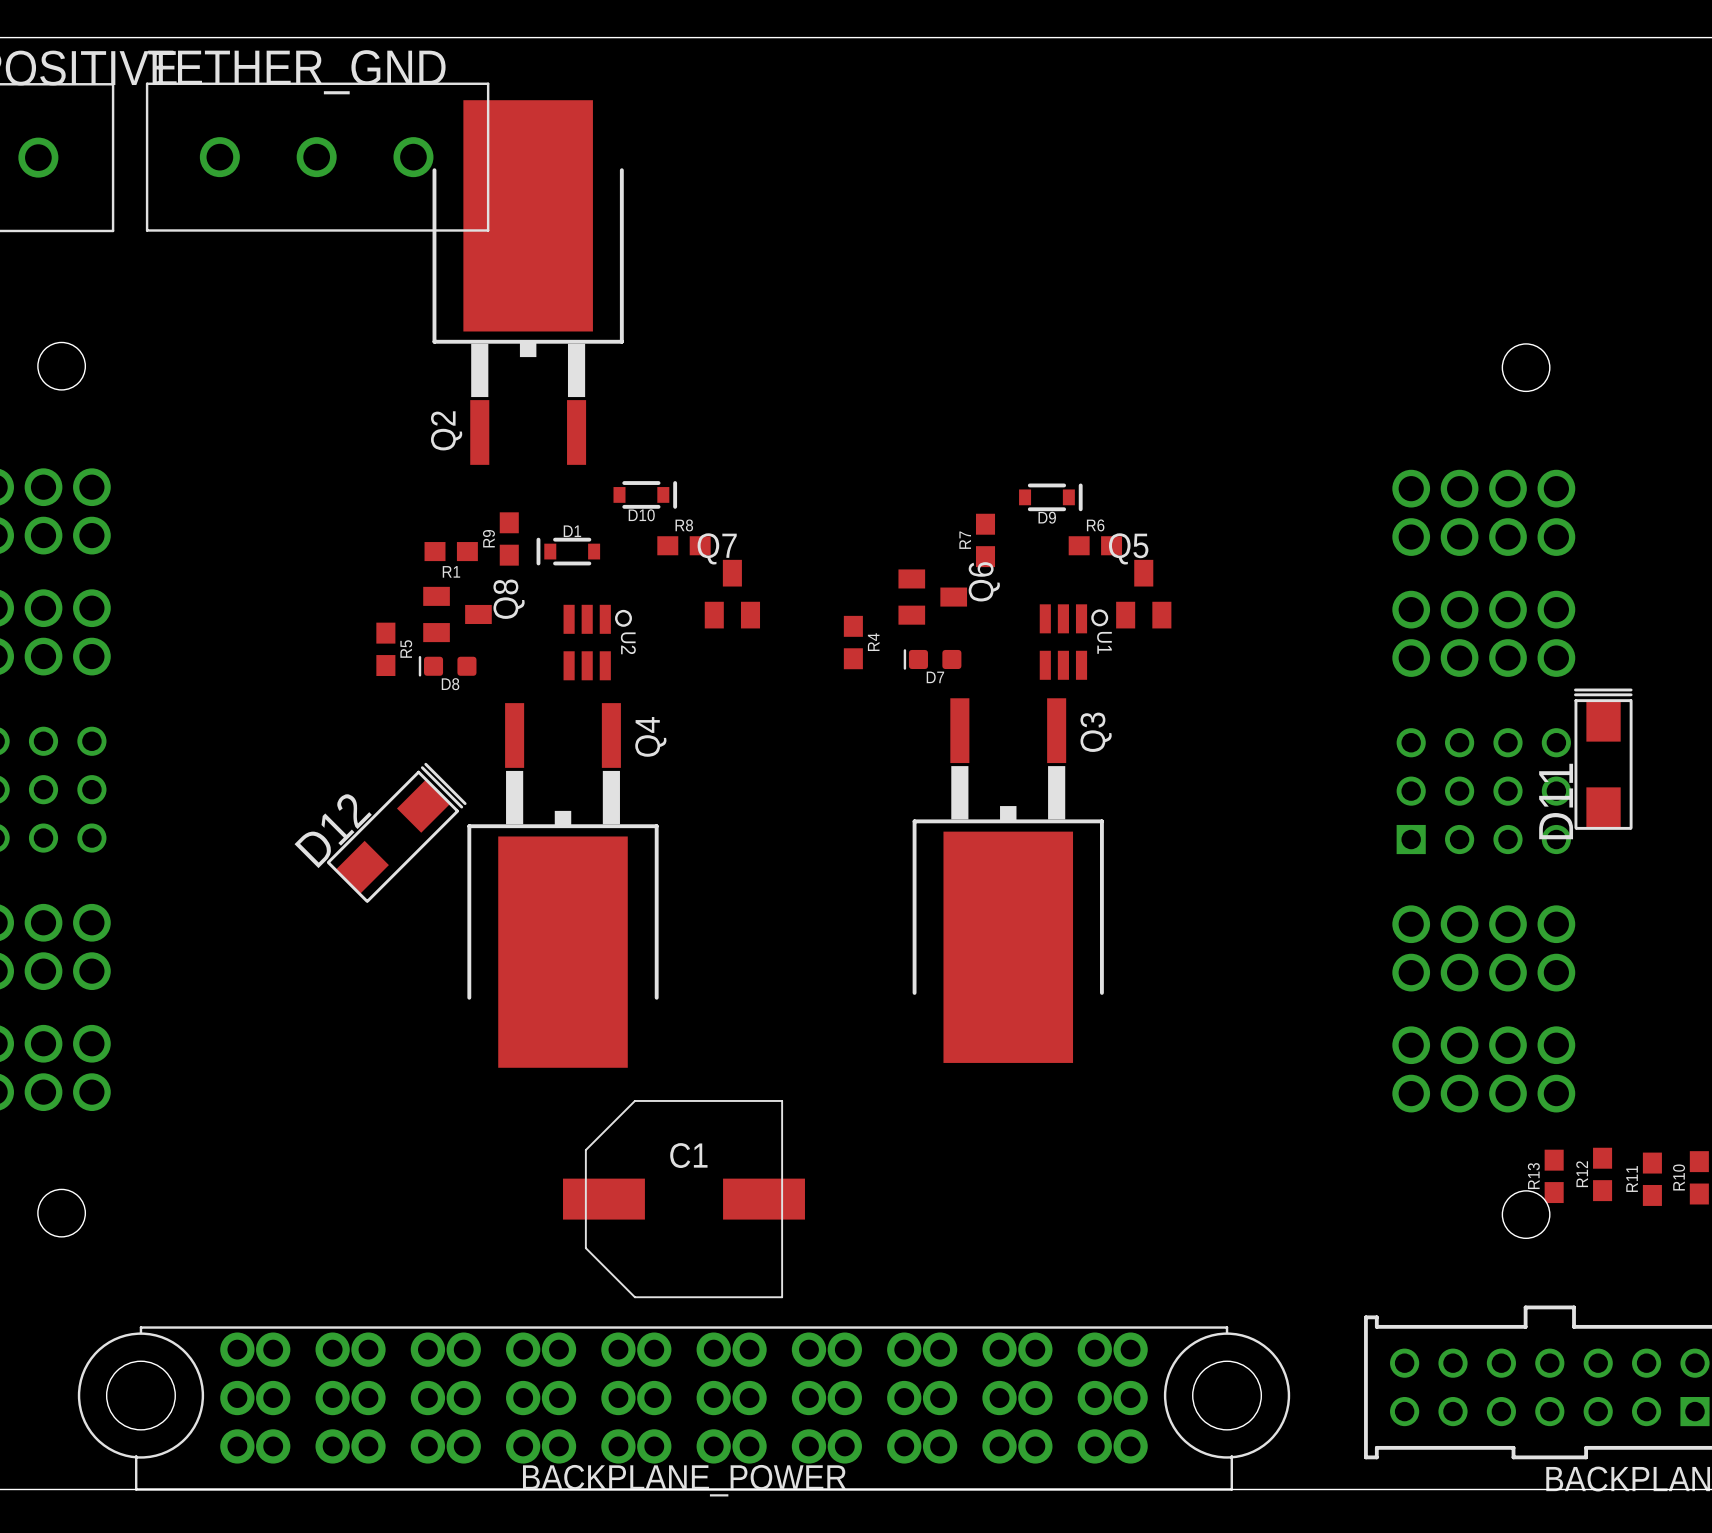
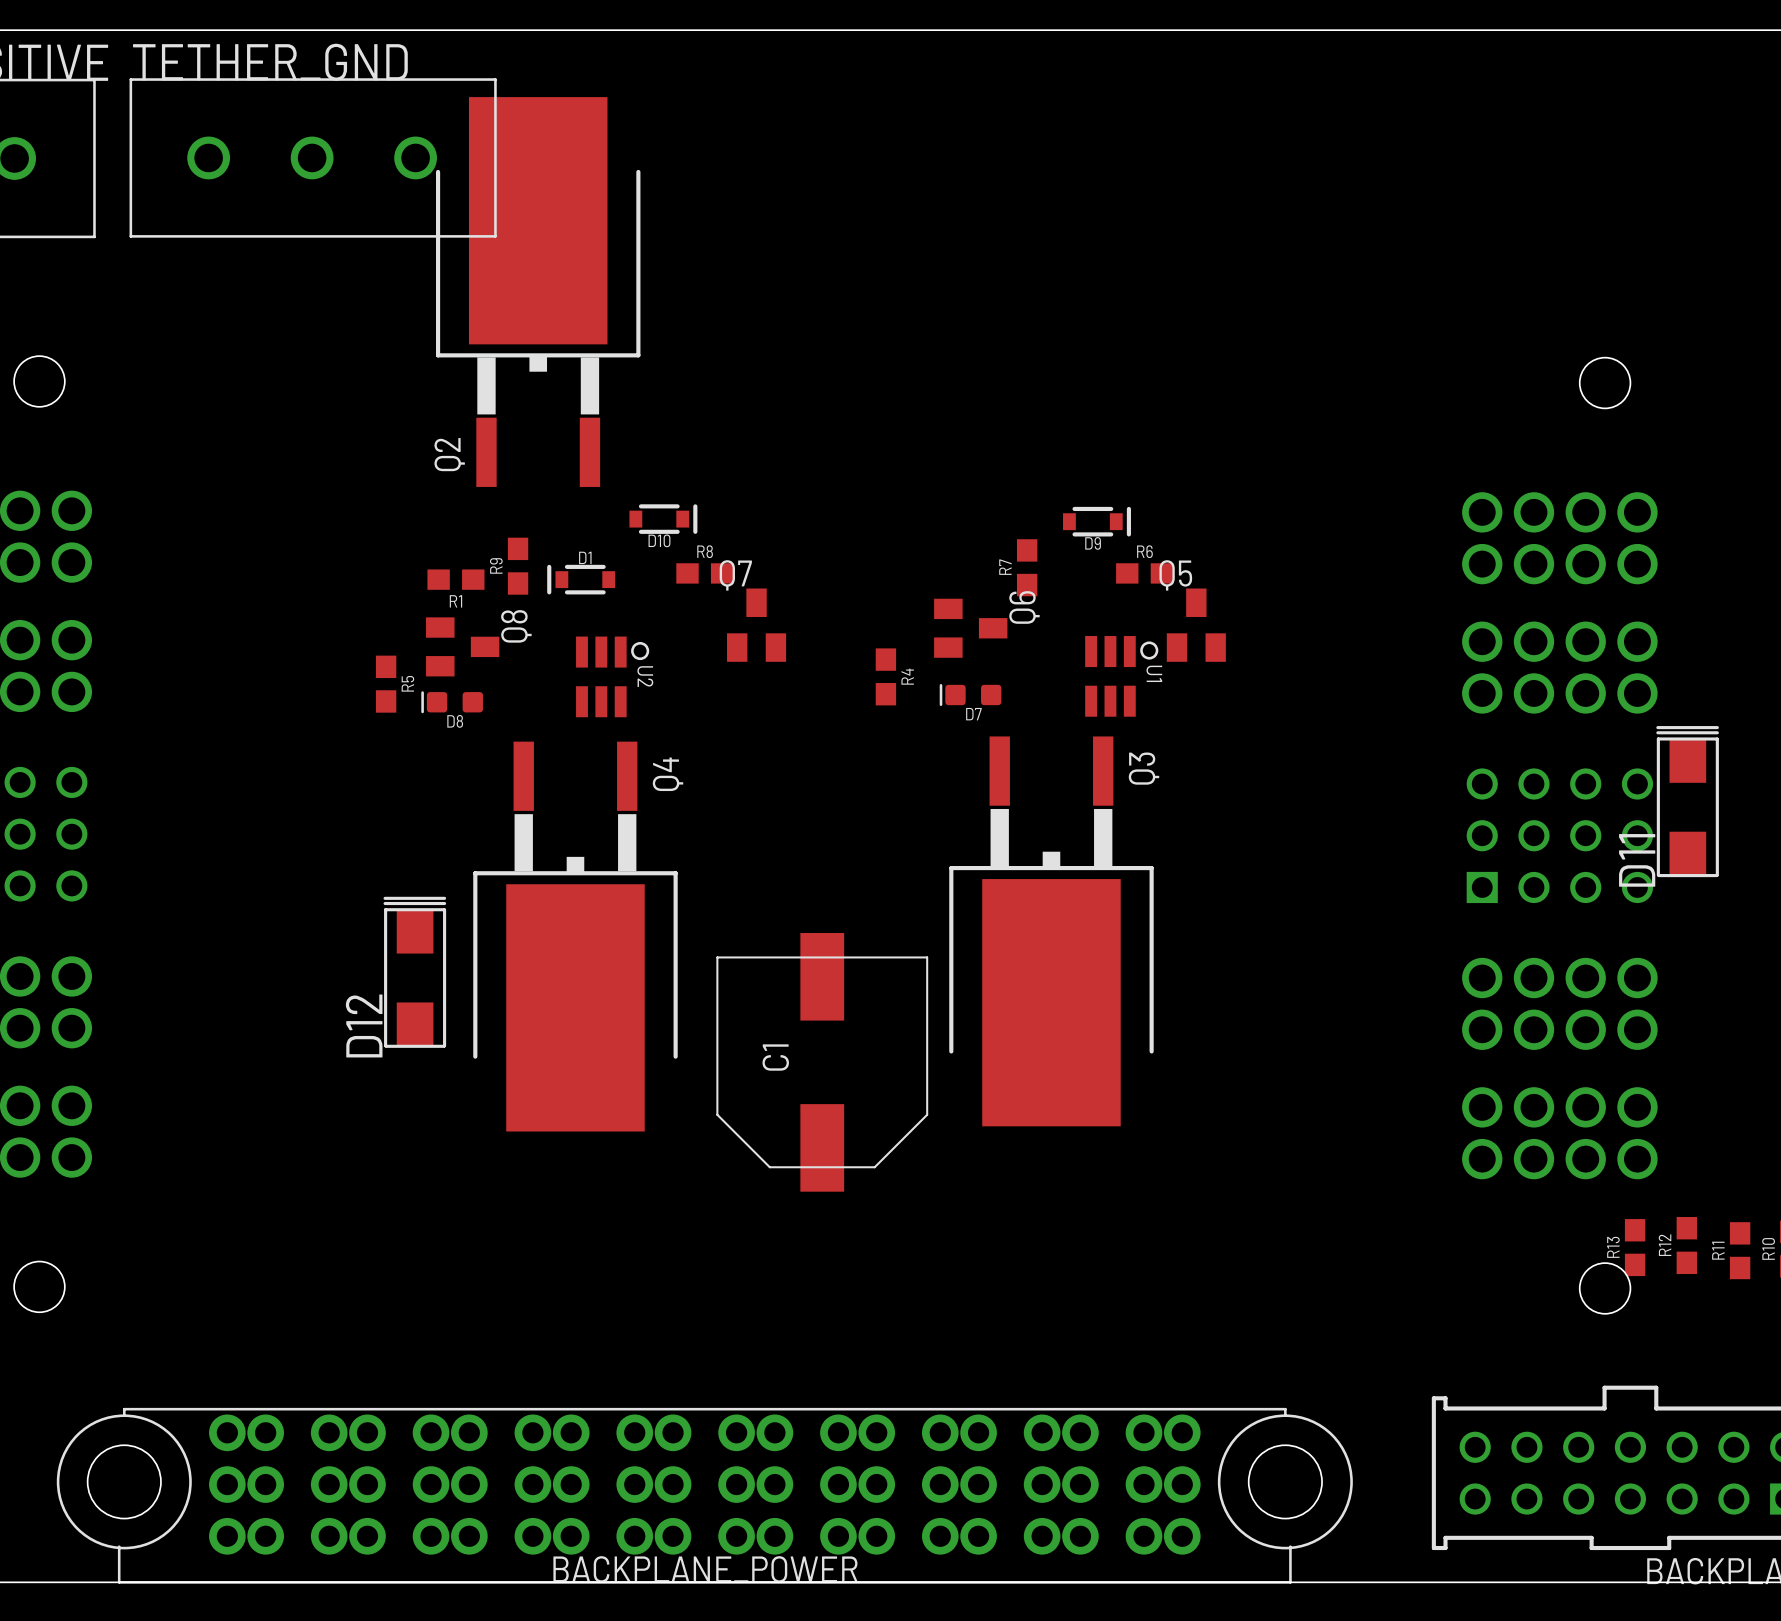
D12 rotation: 0° (396, 832) -> 45° counterclockwise (414, 972)
D12 position: (396, 832) -> (414, 972)
C1 rotation: 0° (683, 1199) -> 90° counterclockwise (822, 1062)
C1 position: (683, 1199) -> (822, 1062)

